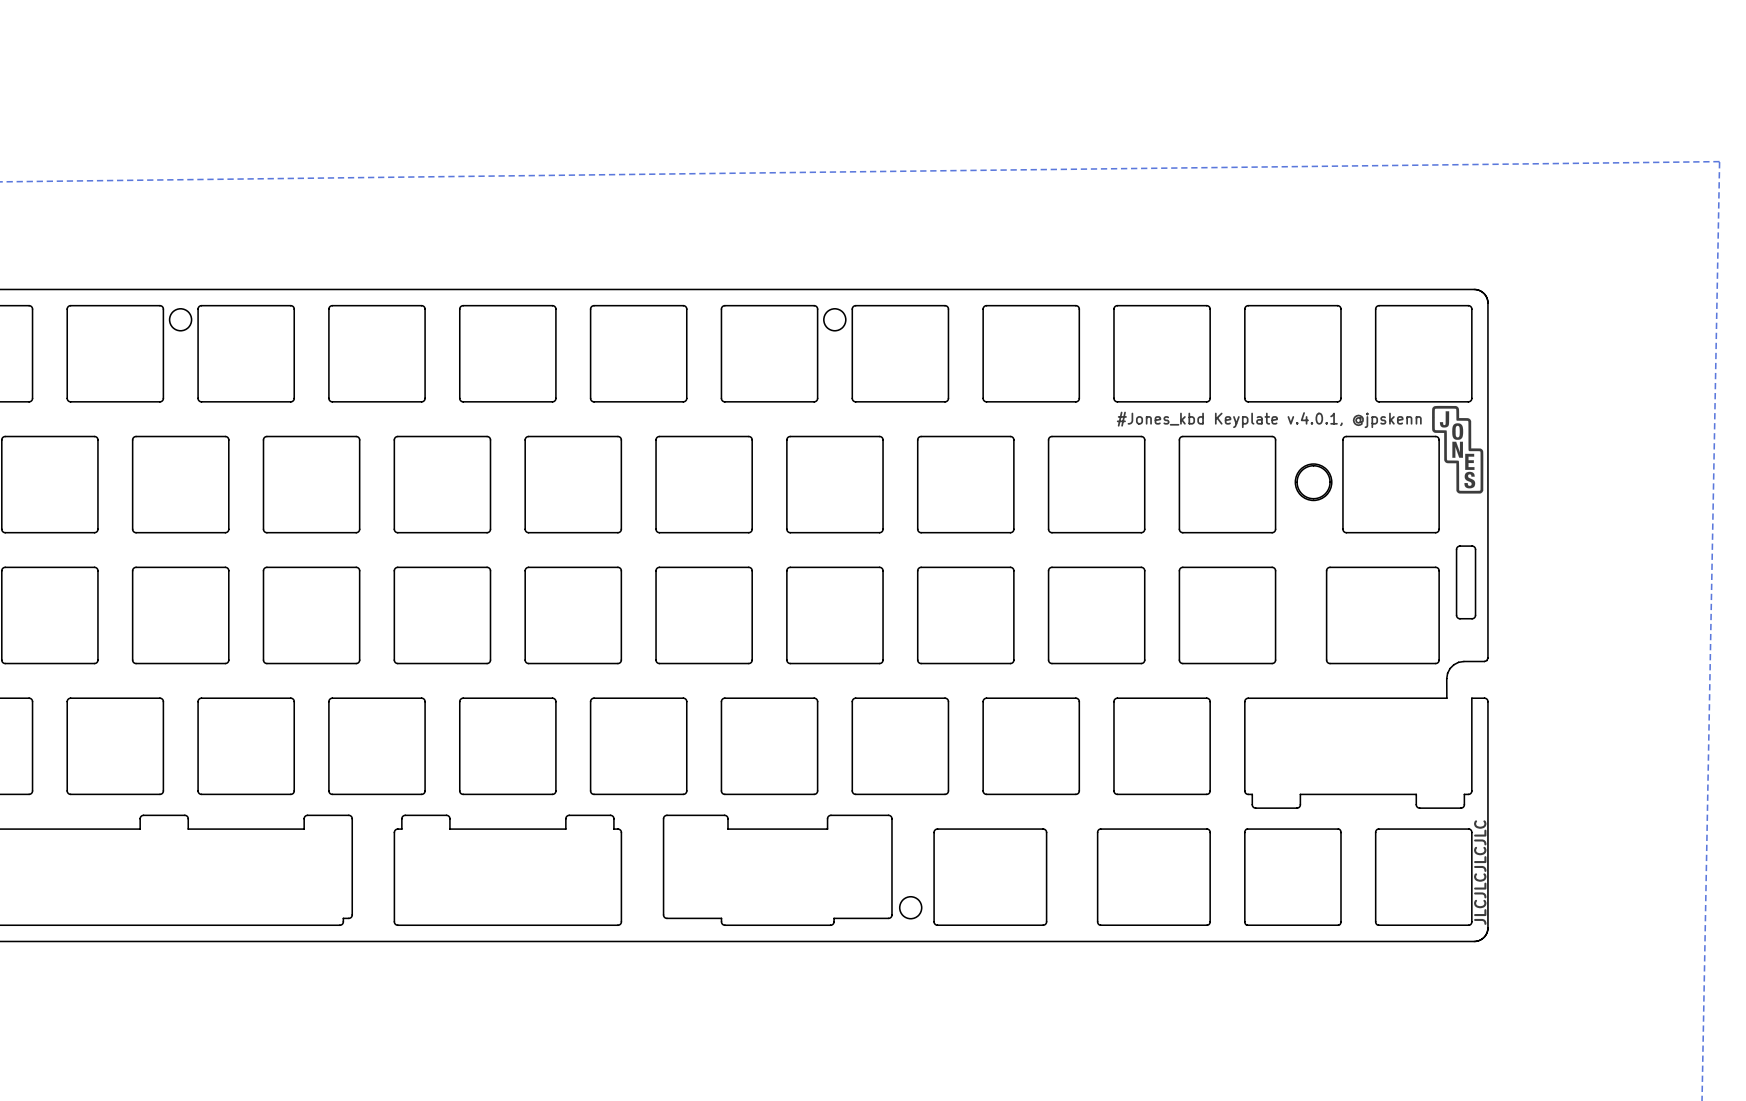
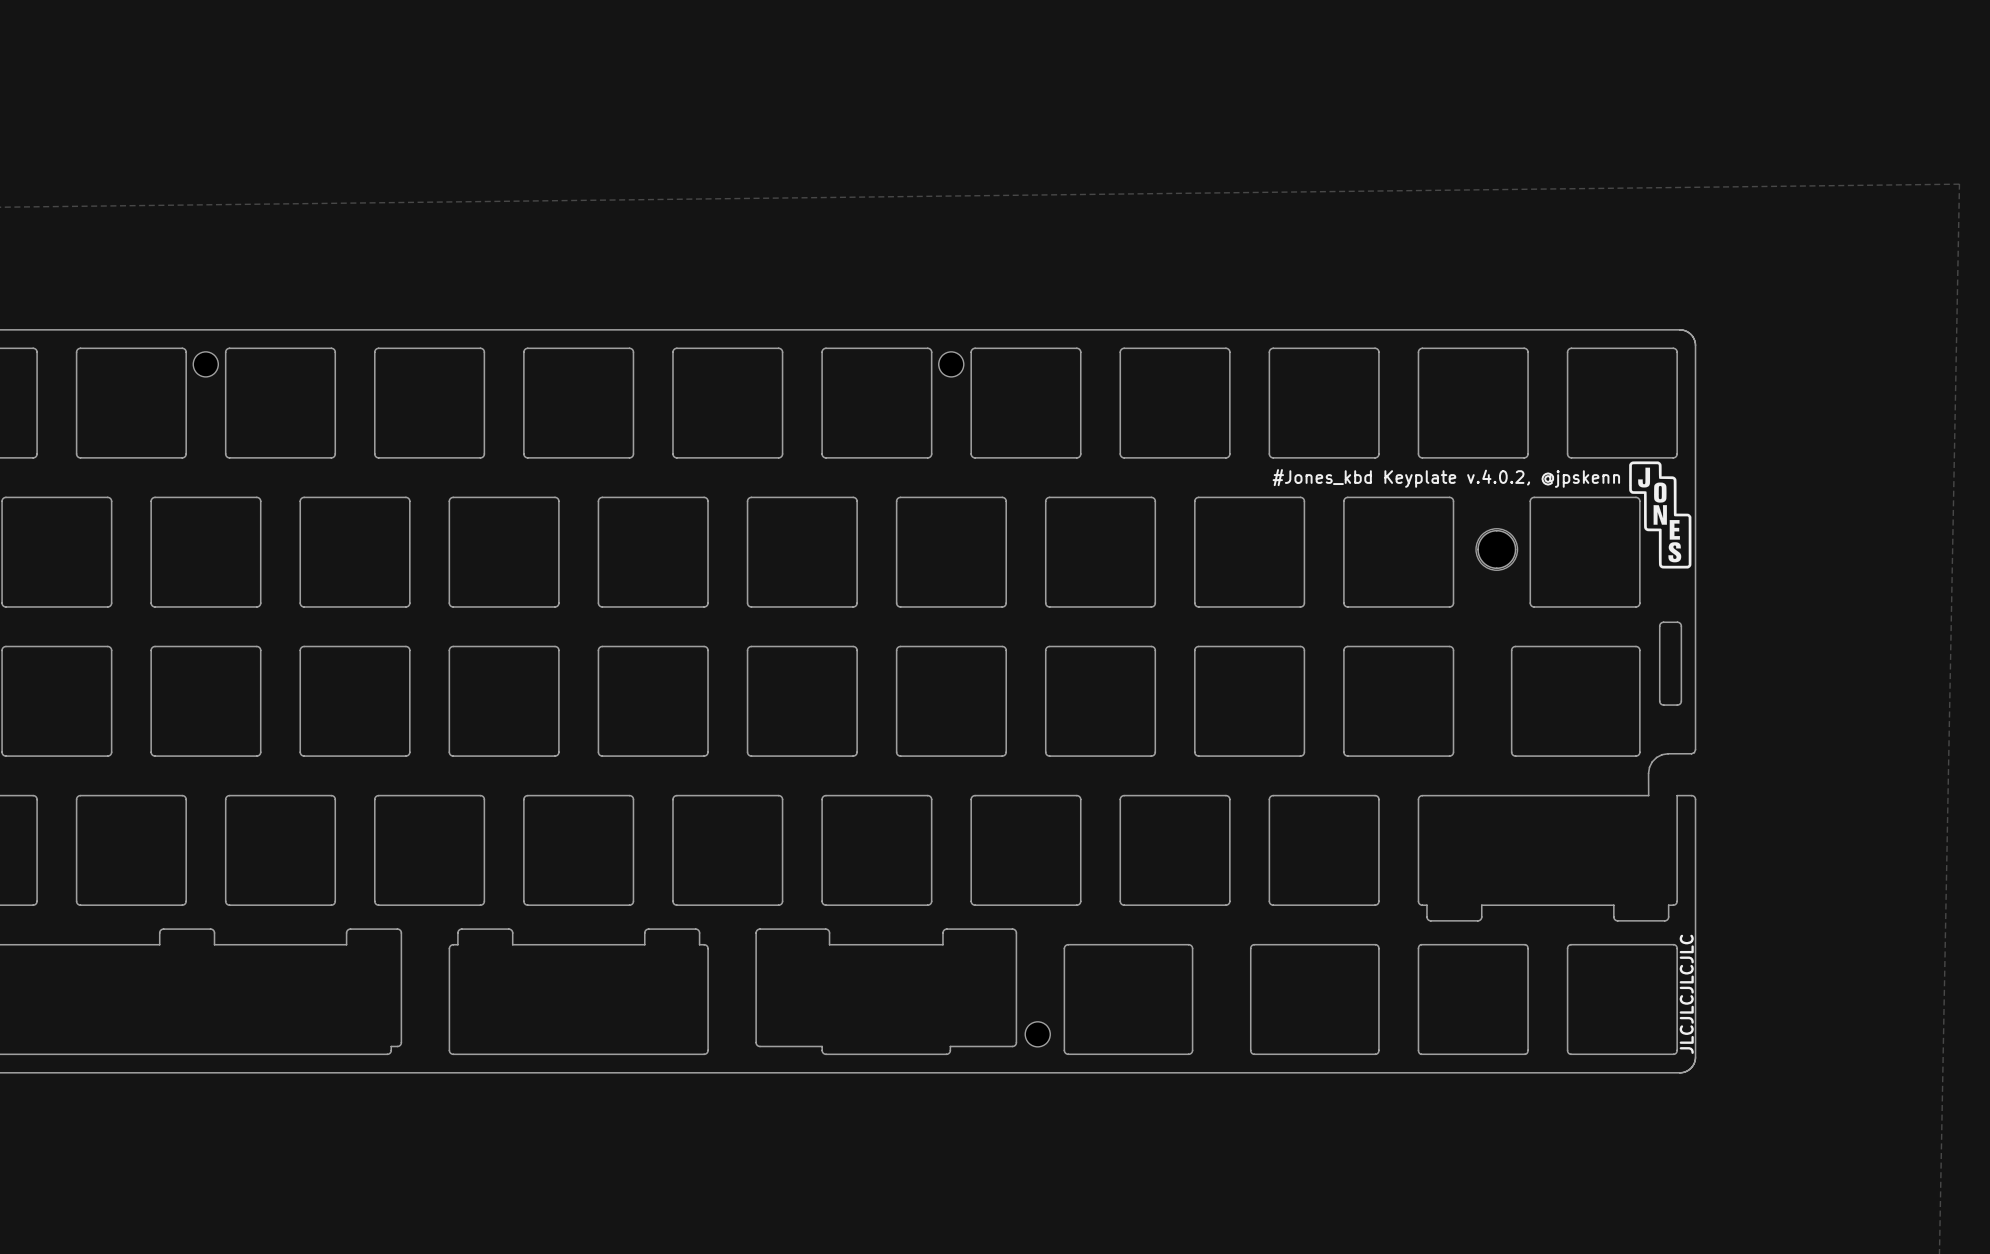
drawing shape: [1432, 405, 1484, 494] -> [1629, 461, 1692, 569]
text: #Jones_kbd Keyplate v.4.0.1, @jpskenn (1269, 419) -> #Jones_kbd Keyplate v.4.0.2, @jpskenn (1446, 478)

